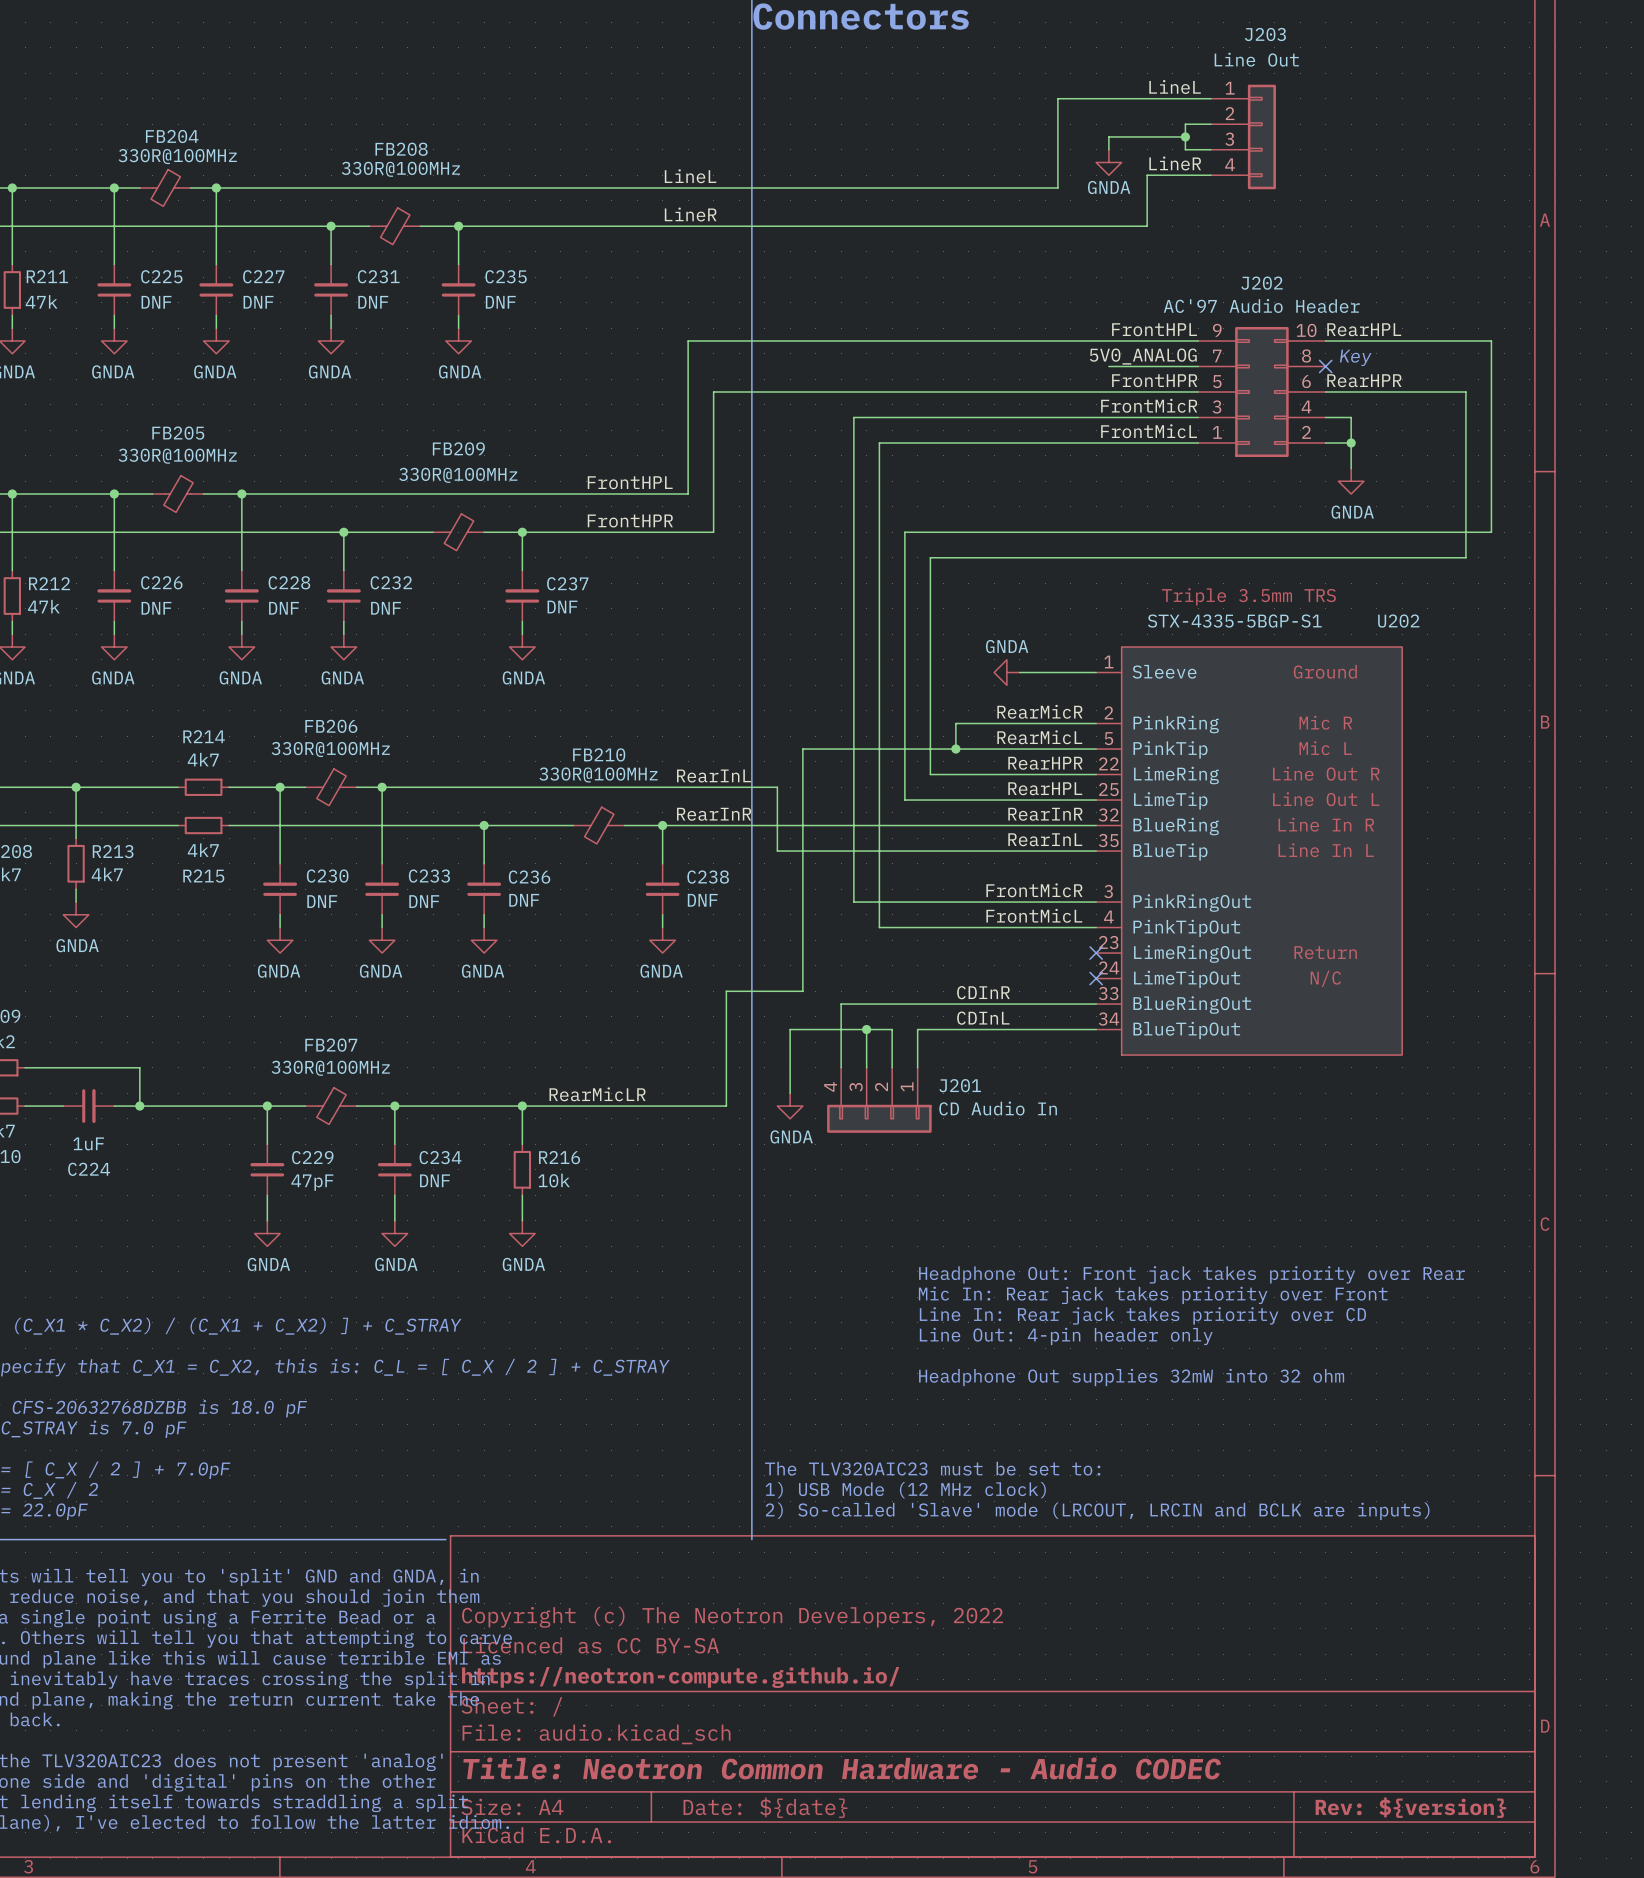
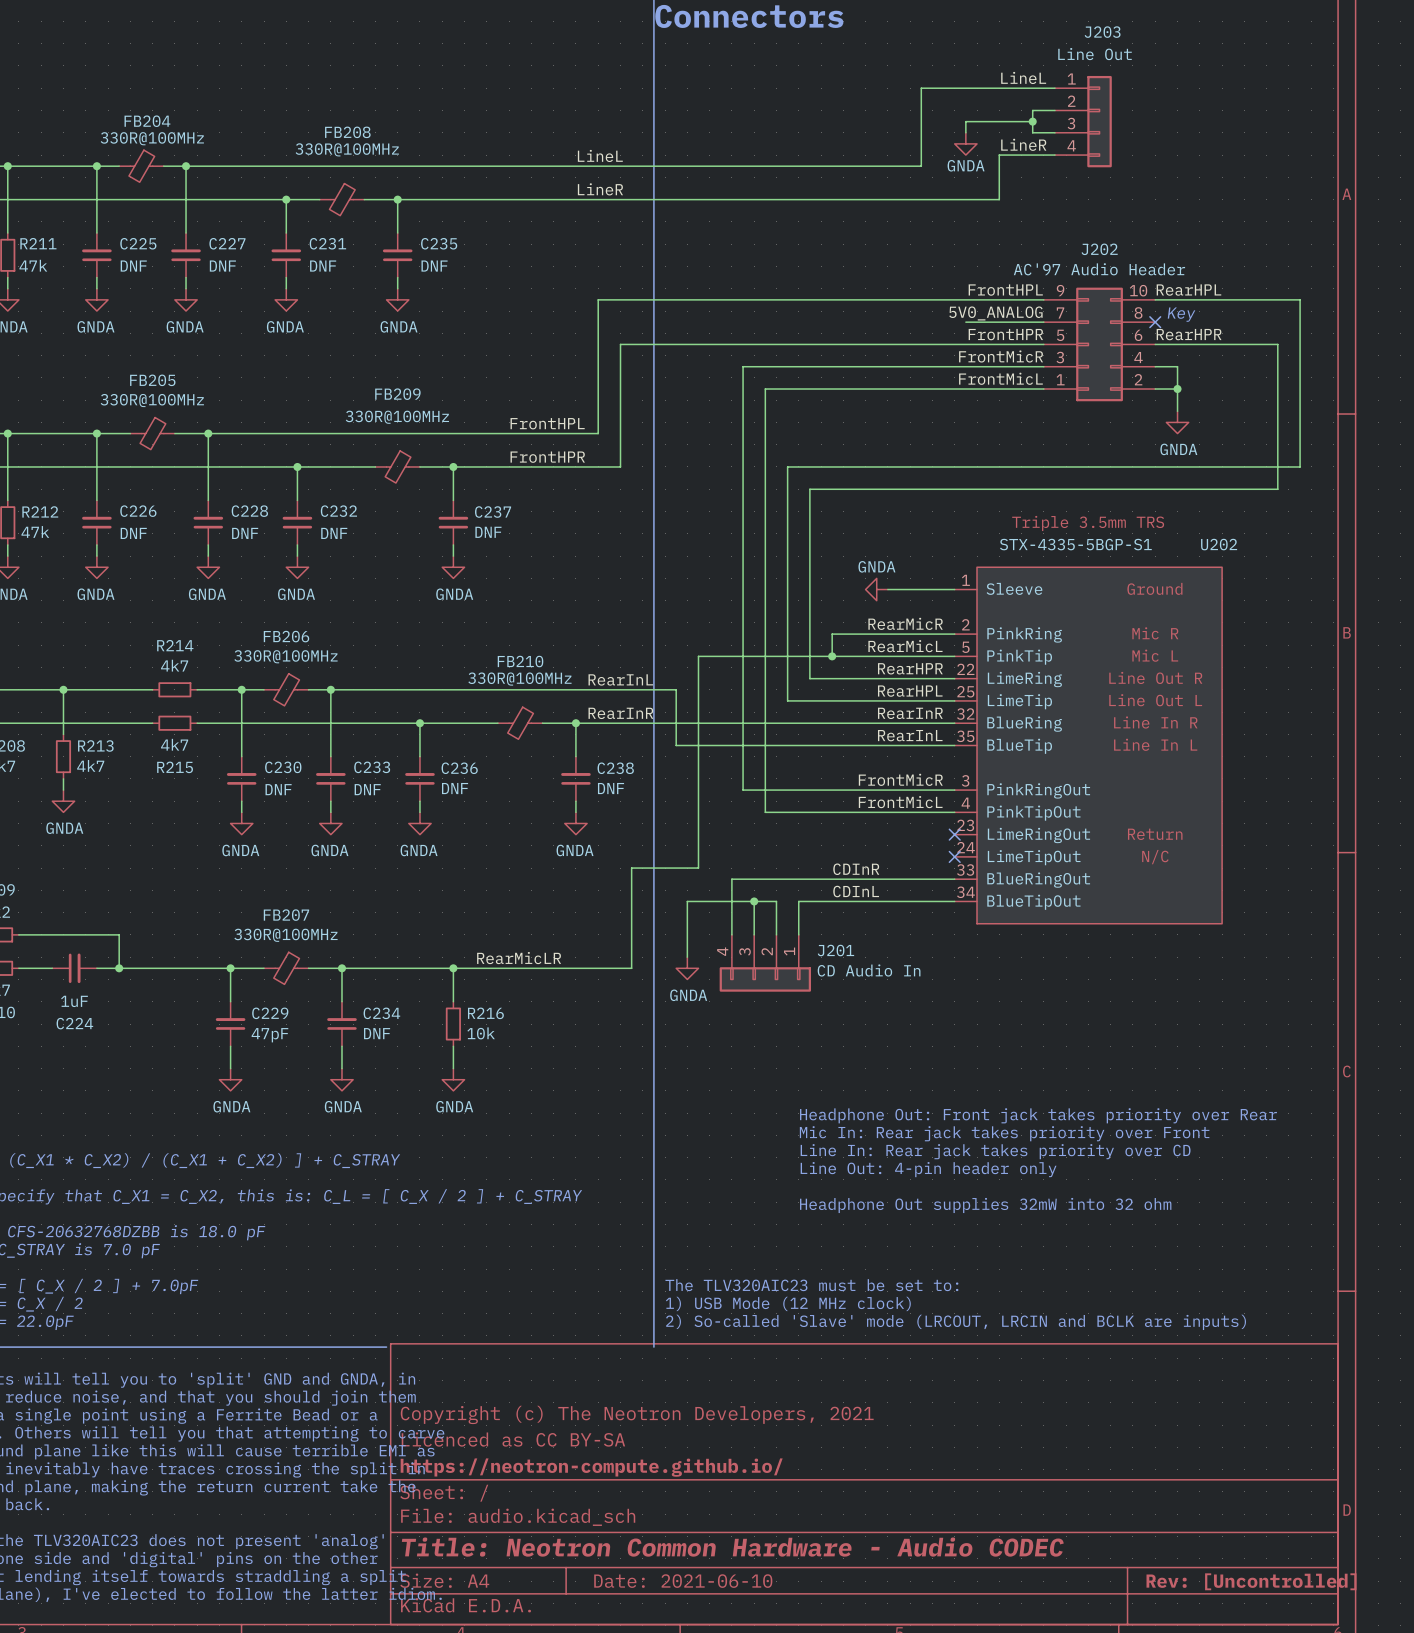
title block: Copyright (c) The Neotron Developers, 2022 (732, 1617) -> Copyright (c) The Neotron Developers, 2021 (637, 1414)
title block: Date: ${date} (765, 1807) -> Date: 2021-06-10 (683, 1581)
title block: Rev: ${version} (1410, 1807) -> Rev: [Uncontrolled] (1251, 1581)

